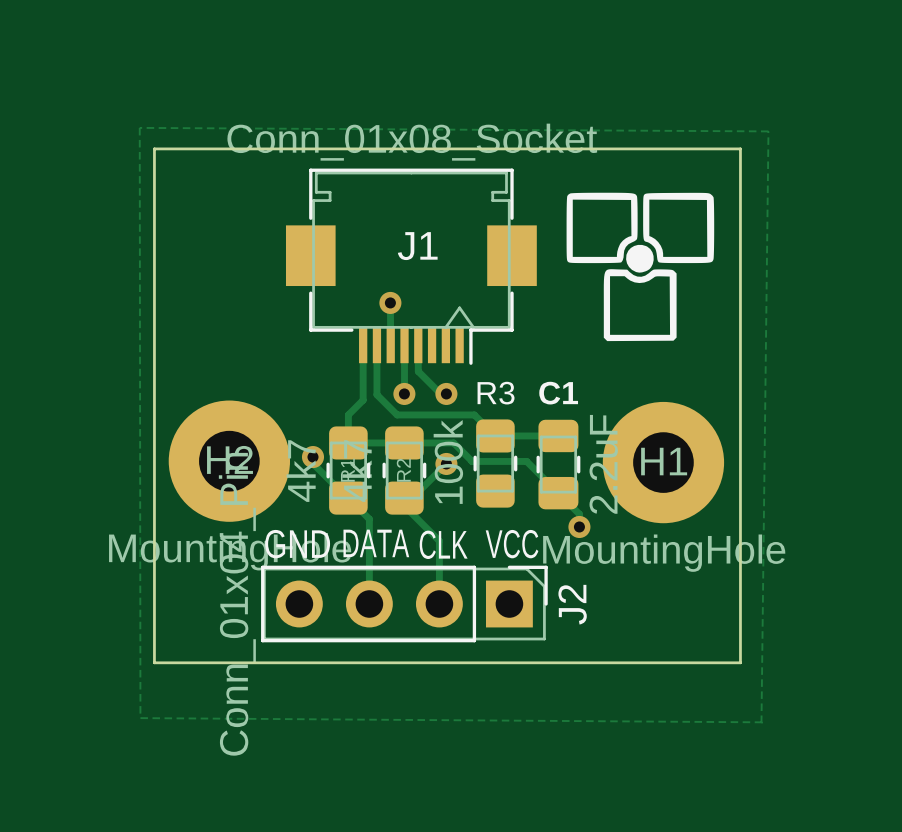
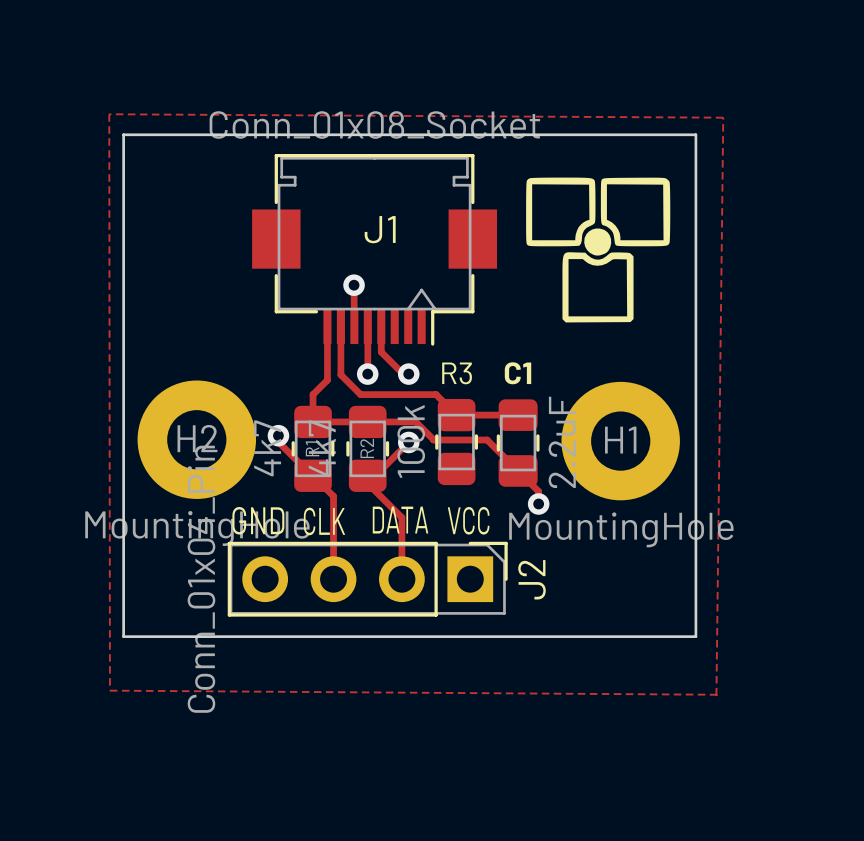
text position: DATA (376, 543) -> DATA (400, 520)
text position: CLK (443, 544) -> CLK (324, 521)

